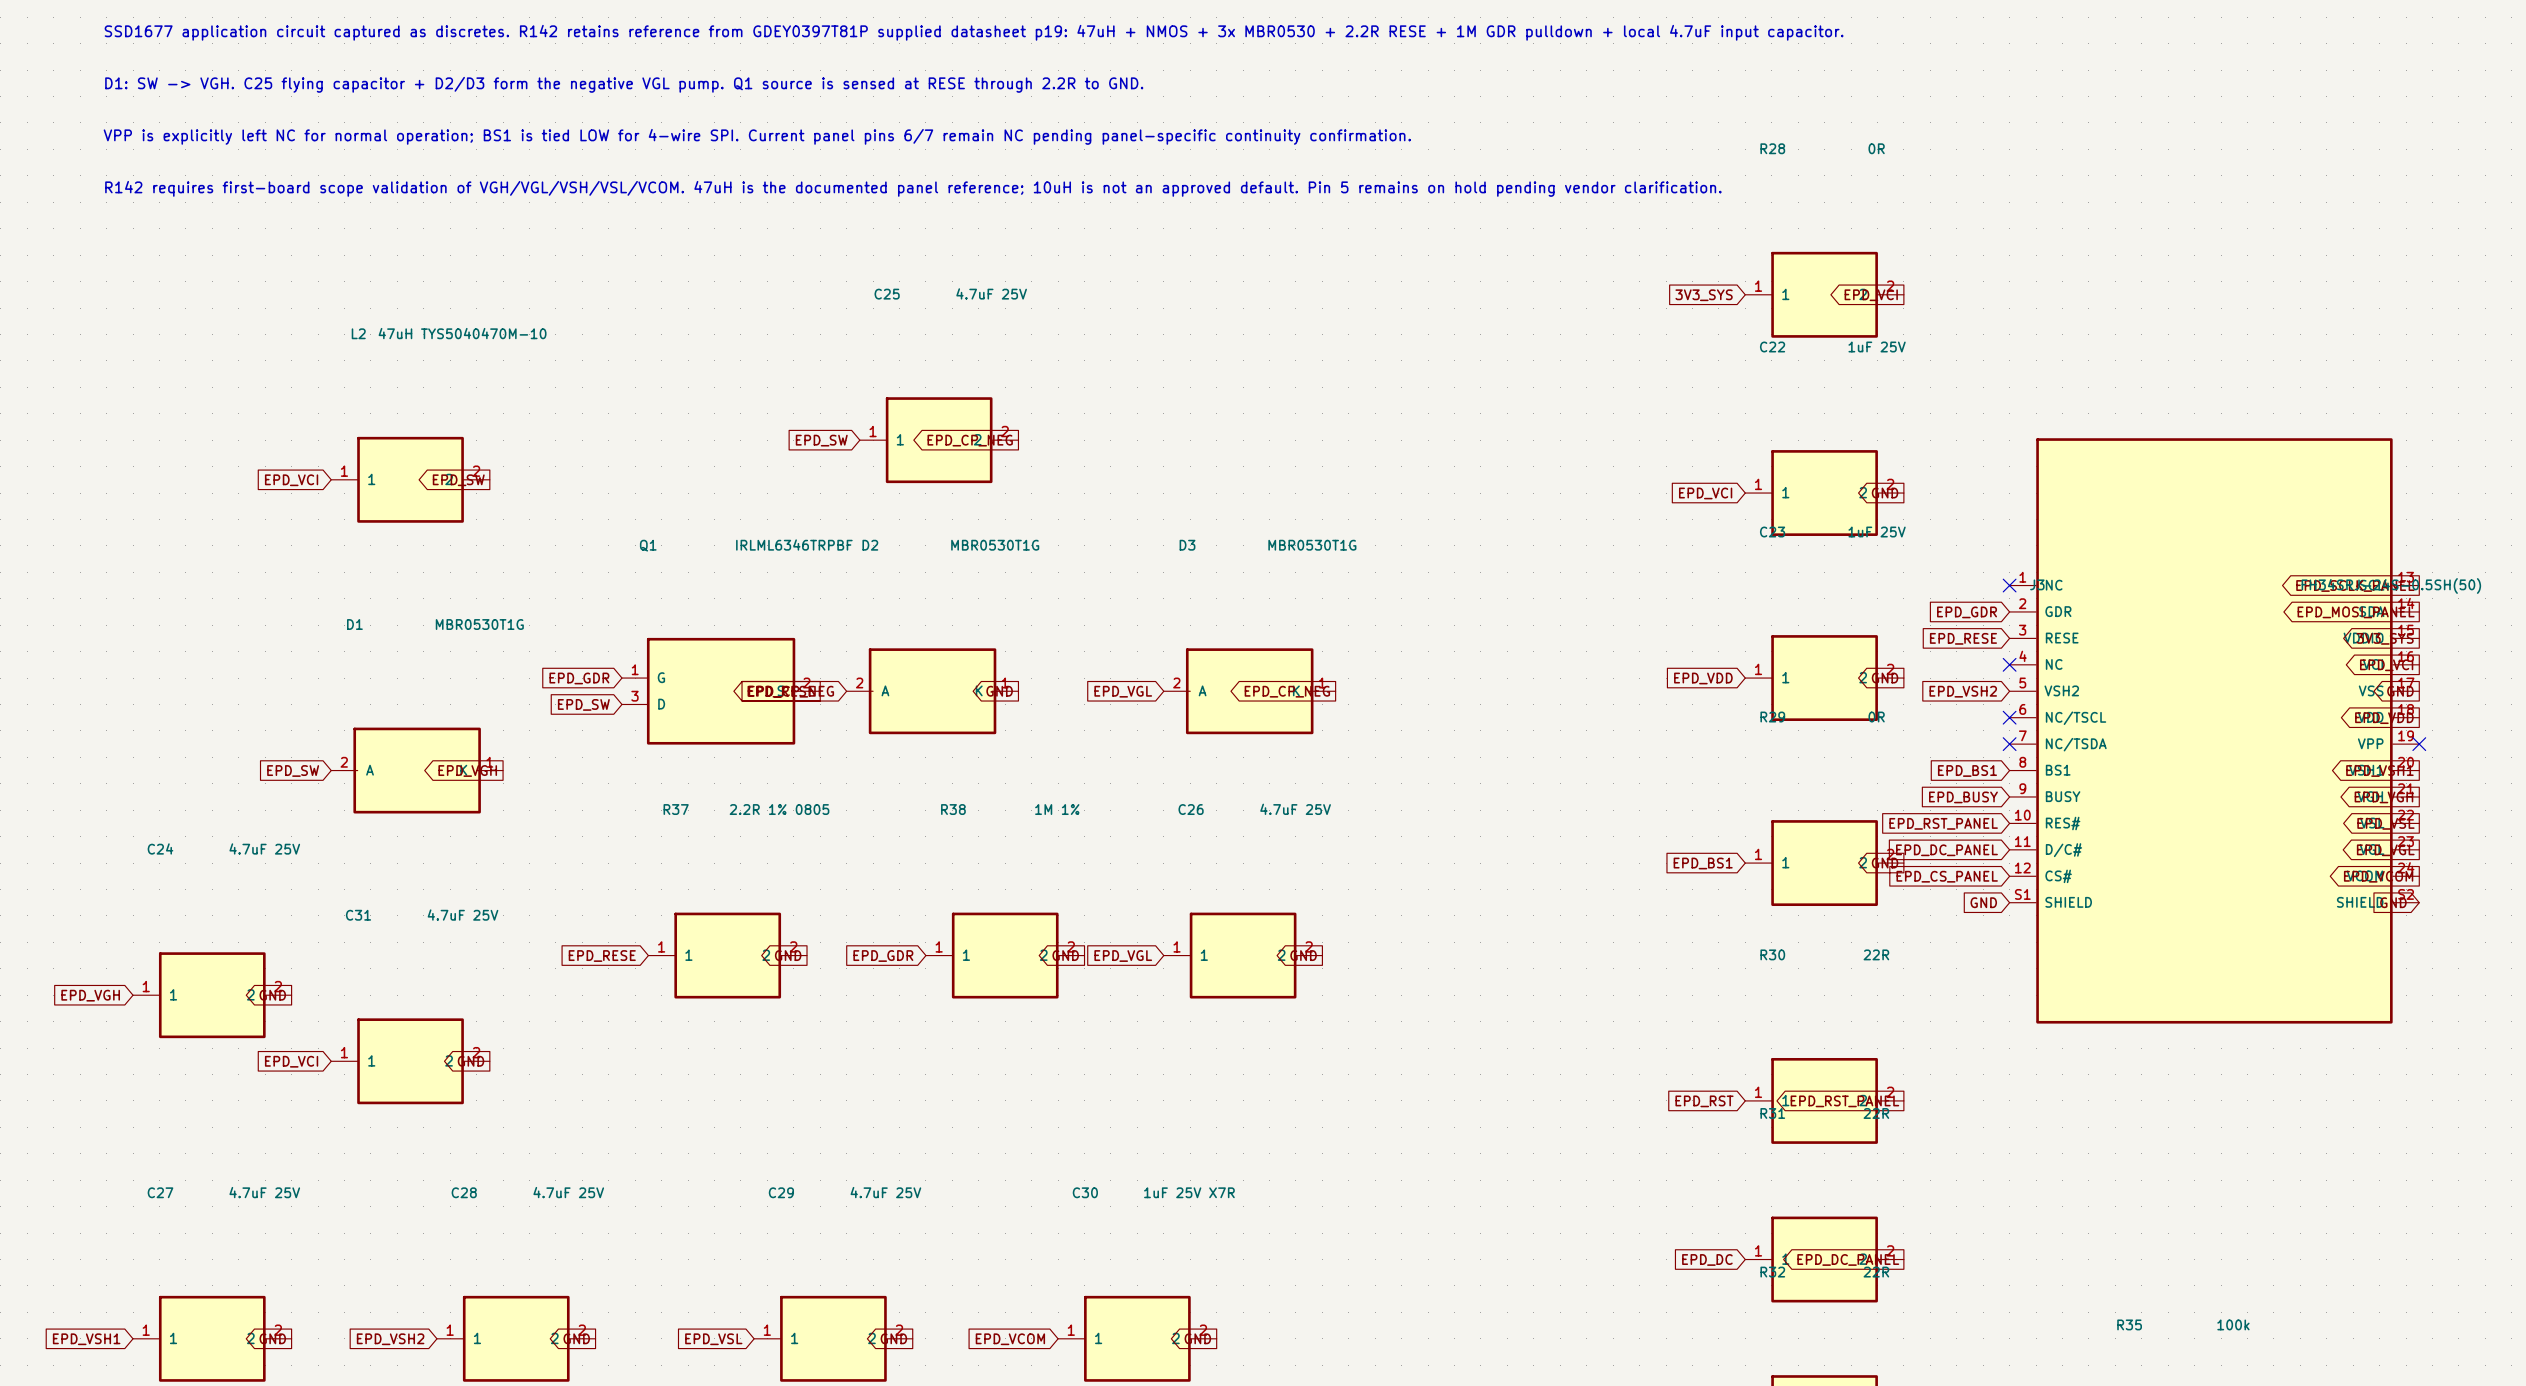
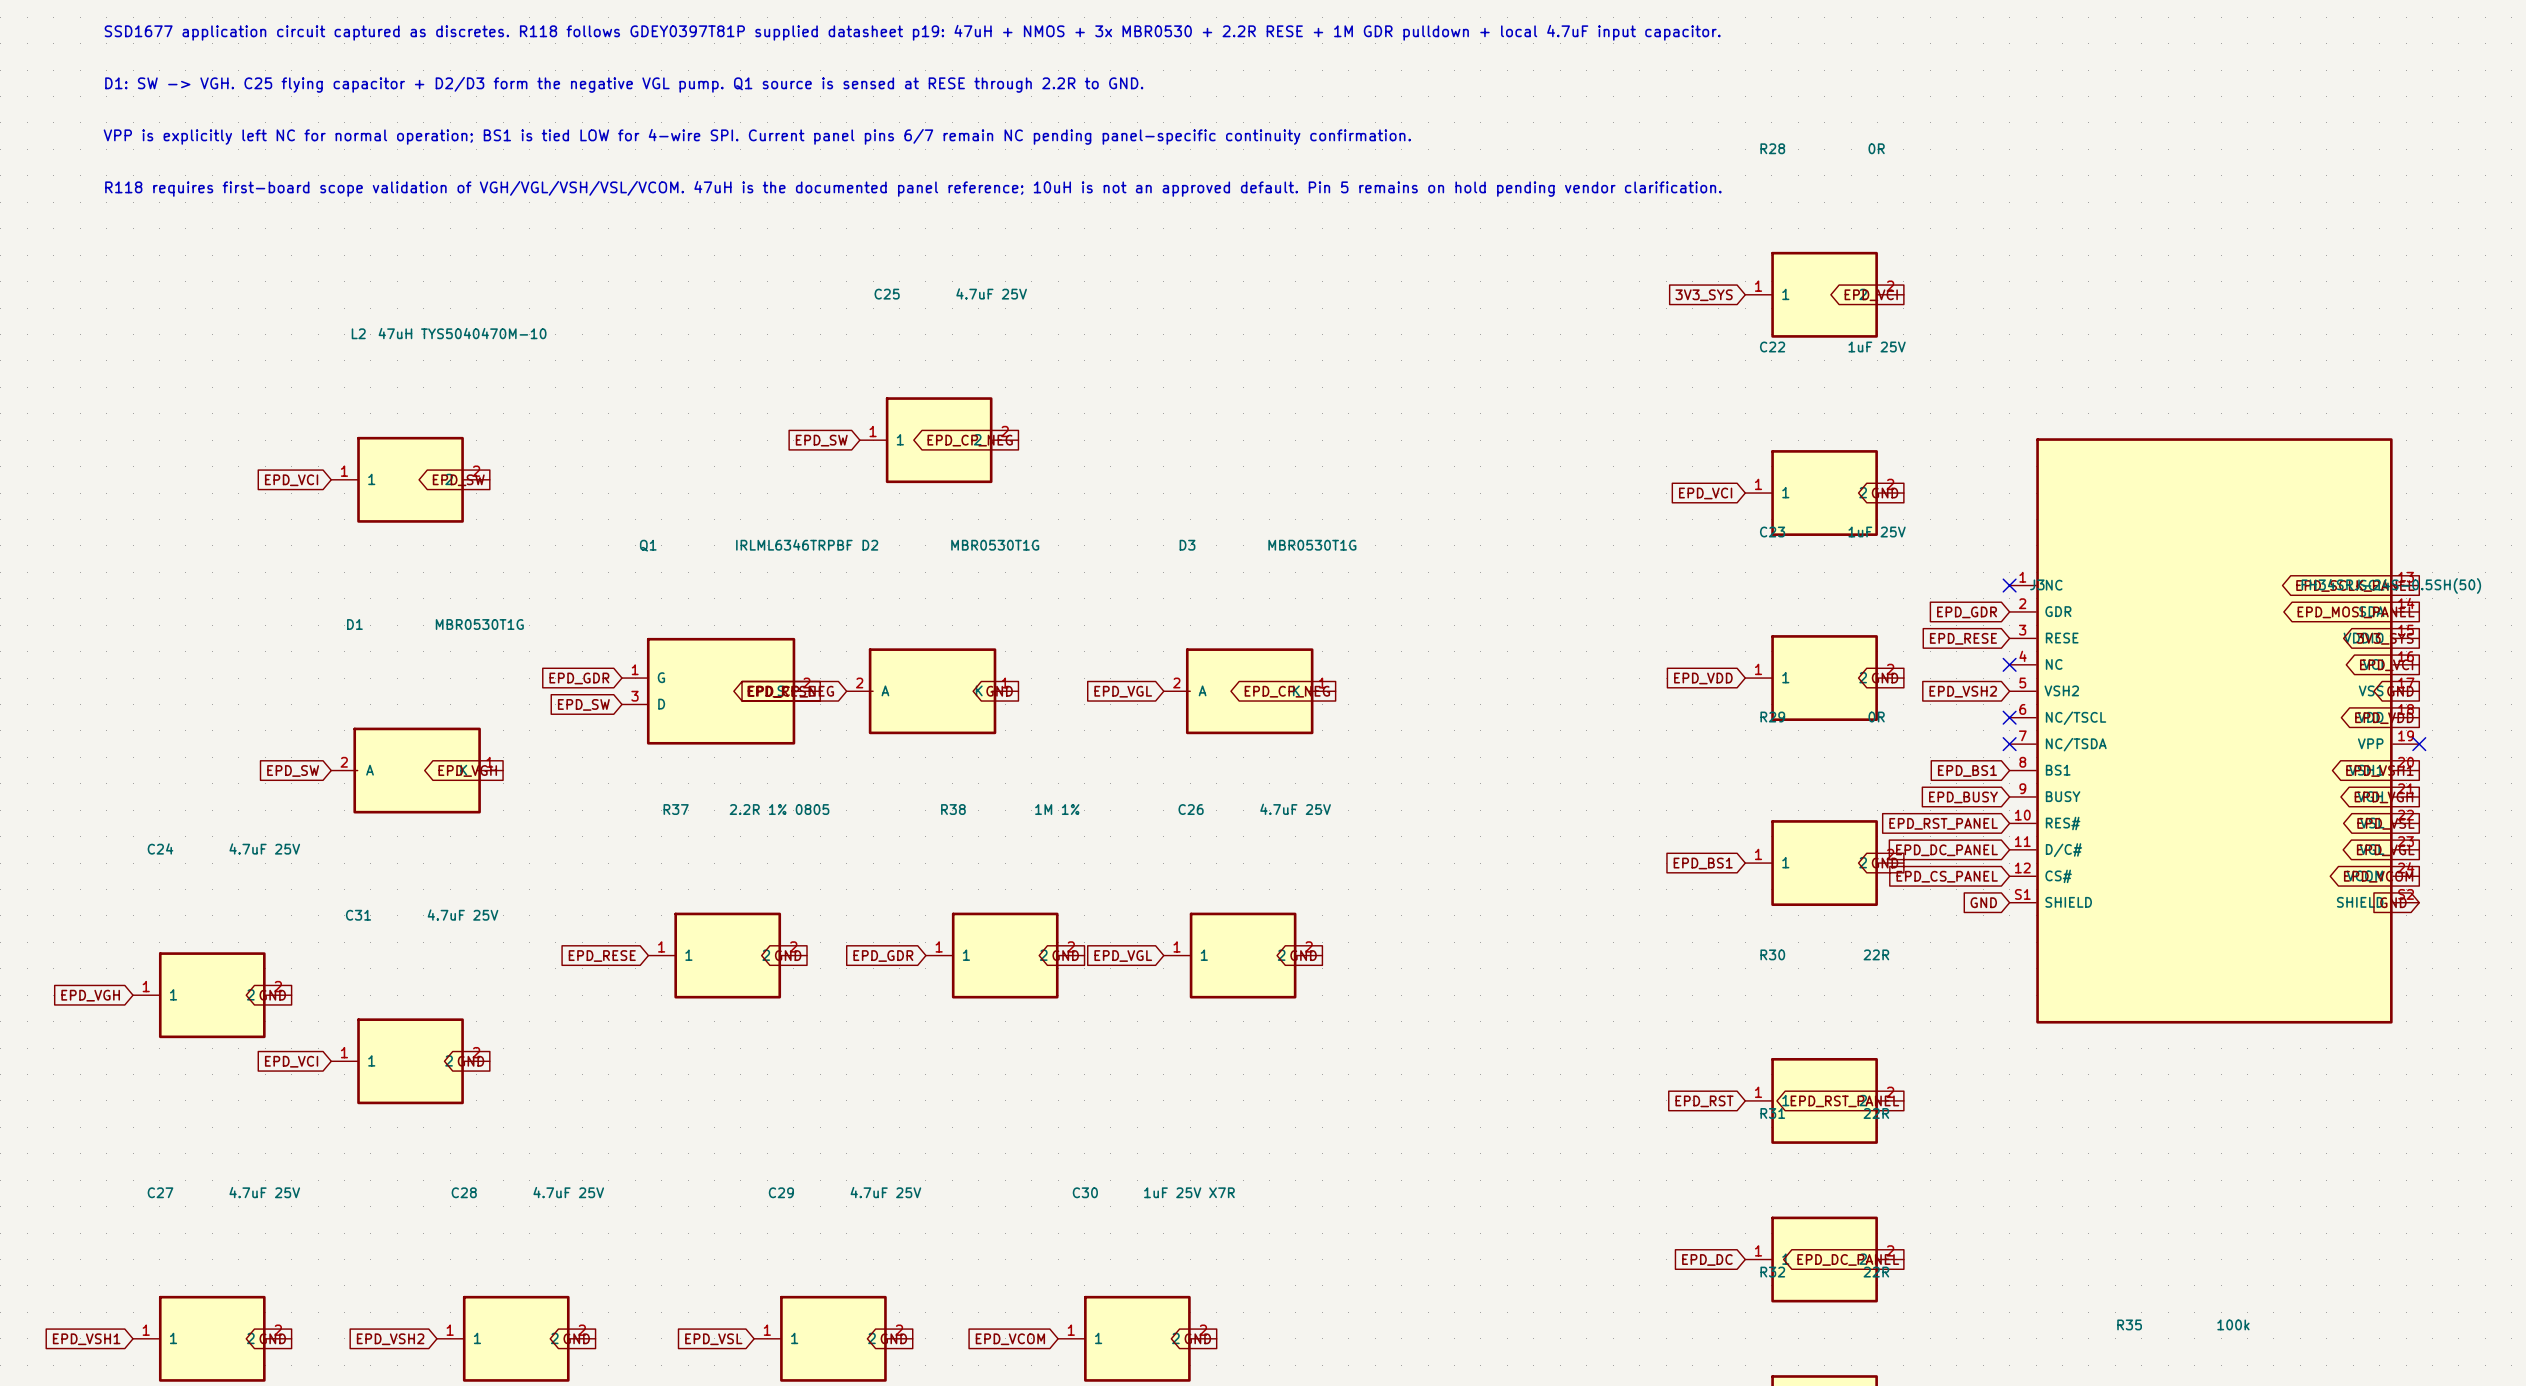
text: SSD1677 application circuit captured as discretes. R142 retains reference from GDEY0397T81P supplied datasheet p19: 47uH + NMOS + 3x MBR0530 + 2.2R RESE + 1M GDR pulldown + local 4.7uF input capacitor. (974, 32) -> SSD1677 application circuit captured as discretes. R118 follows GDEY0397T81P supplied datasheet p19: 47uH + NMOS + 3x MBR0530 + 2.2R RESE + 1M GDR pulldown + local 4.7uF input capacitor. (912, 32)
text: R142 requires first-board scope validation of VGH/VGL/VSH/VSL/VCOM. 47uH is the documented panel reference; 10uH is not an approved default. Pin 5 remains on hold pending vendor clarification. (913, 188) -> R118 requires first-board scope validation of VGH/VGL/VSH/VSL/VCOM. 47uH is the documented panel reference; 10uH is not an approved default. Pin 5 remains on hold pending vendor clarification. (913, 188)

